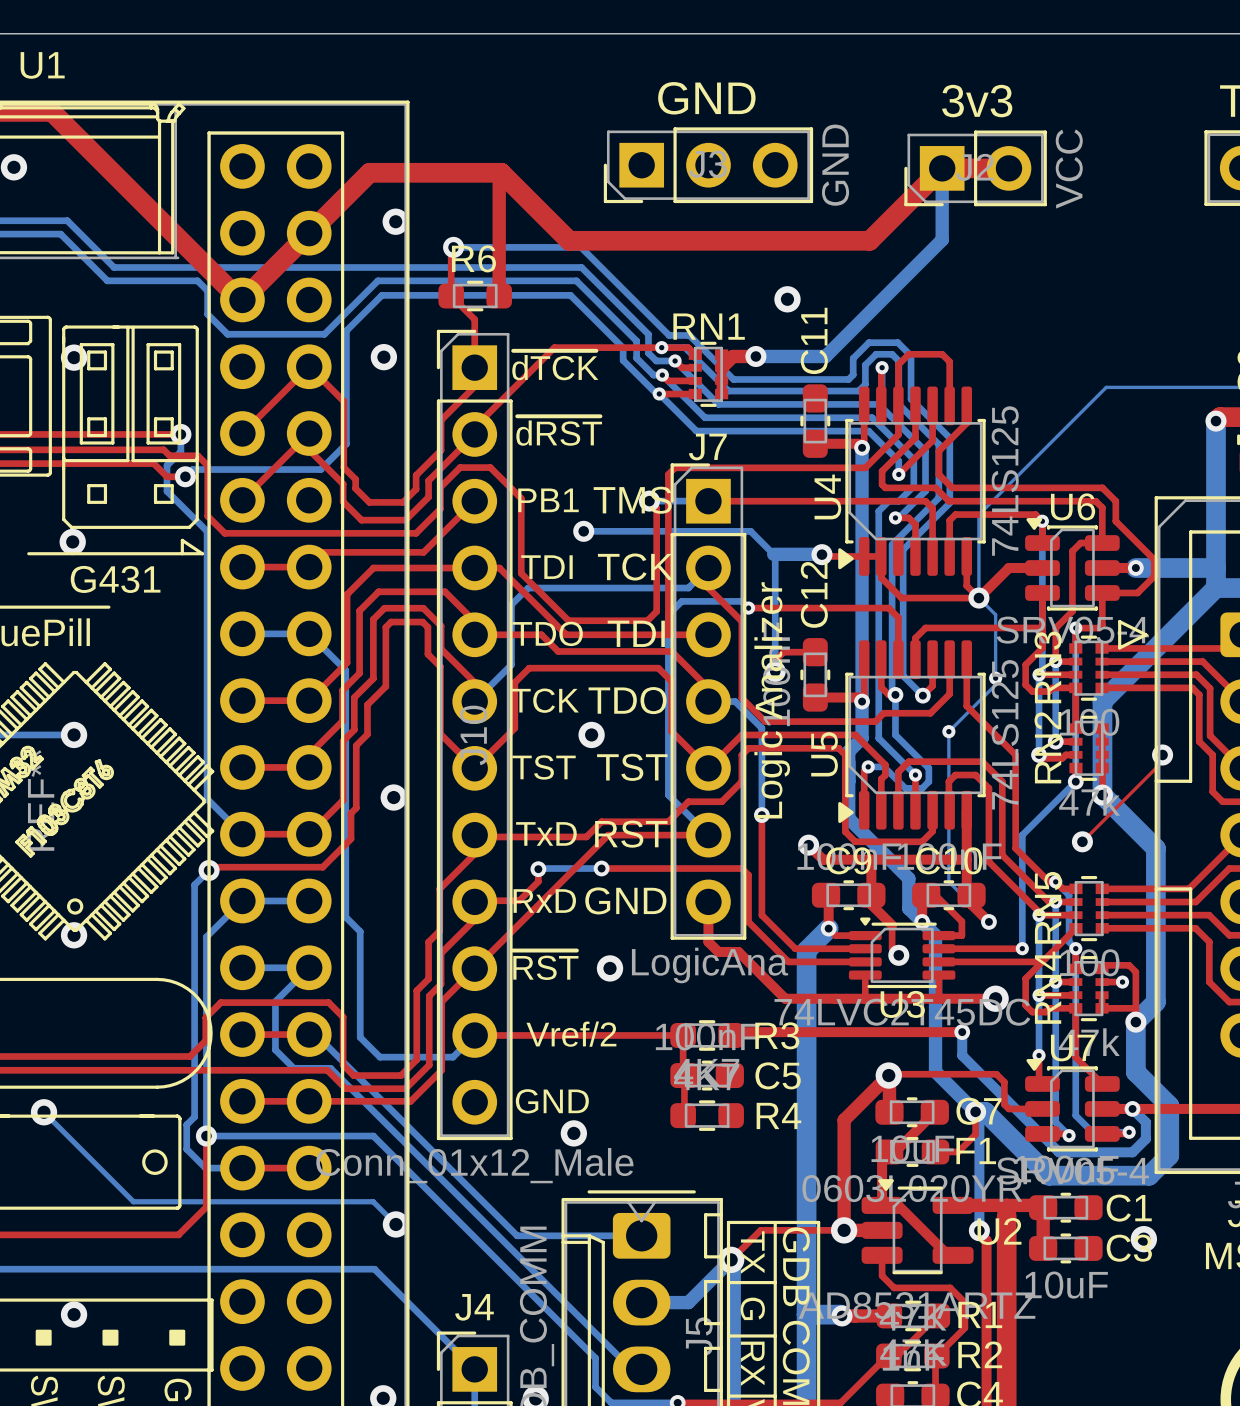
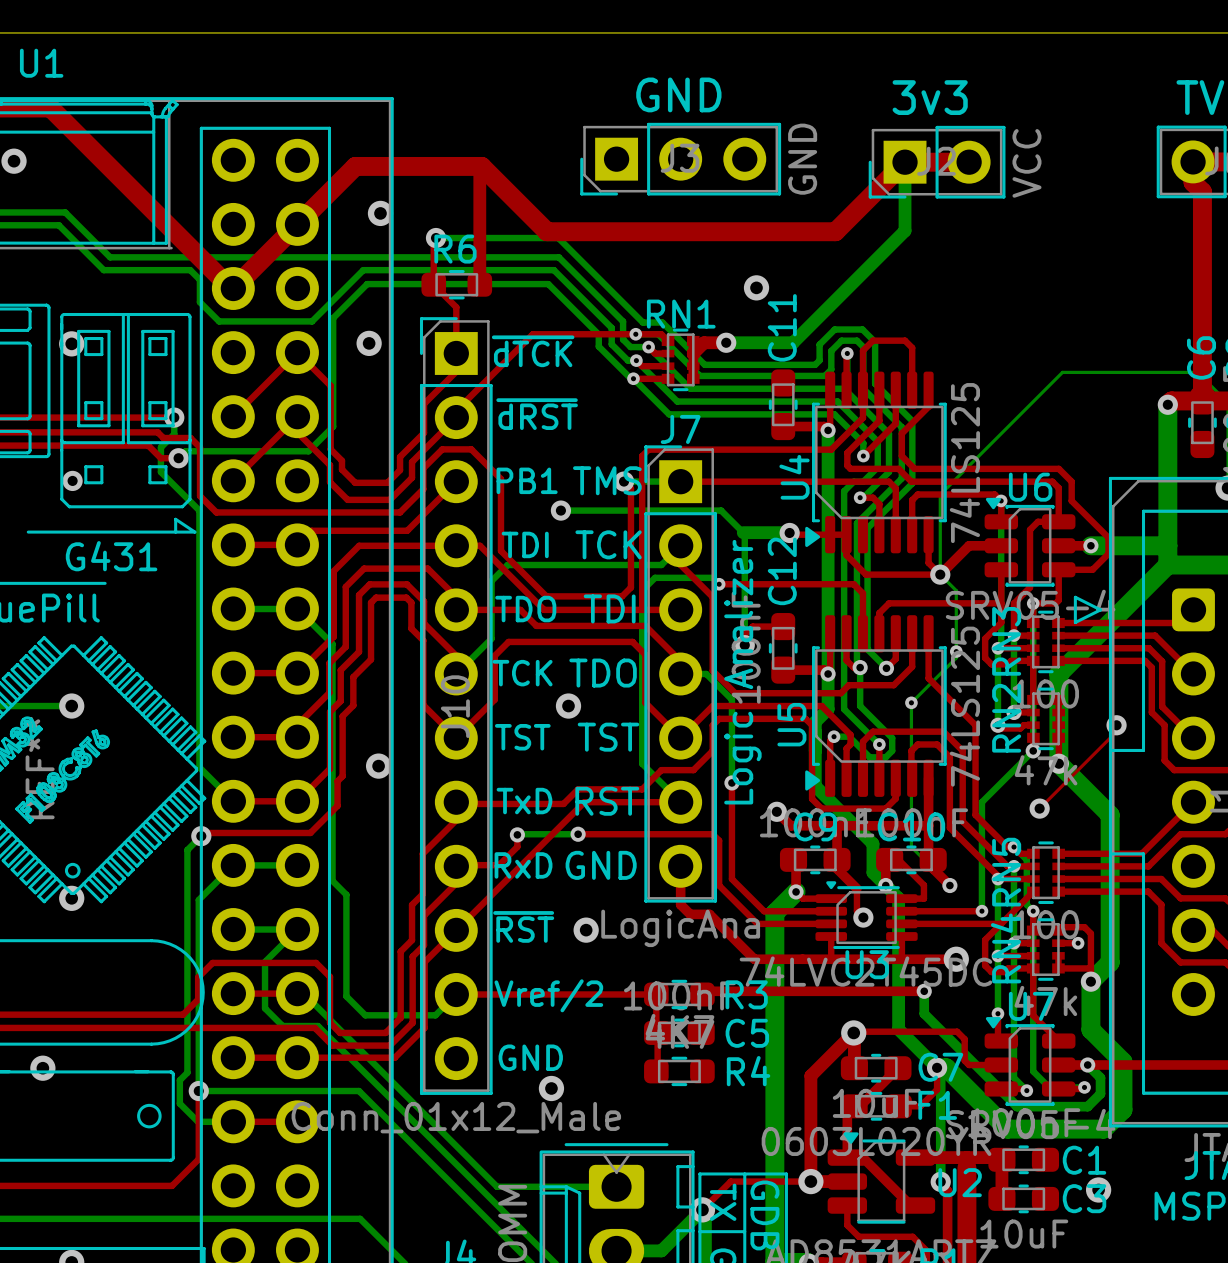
via: none -> (72, 480)
via: (72, 541) -> none
bottom track: (44, 1112) (133, 1201) (373, 1201) (395, 1224) -> none
via: (395, 1224) -> none

